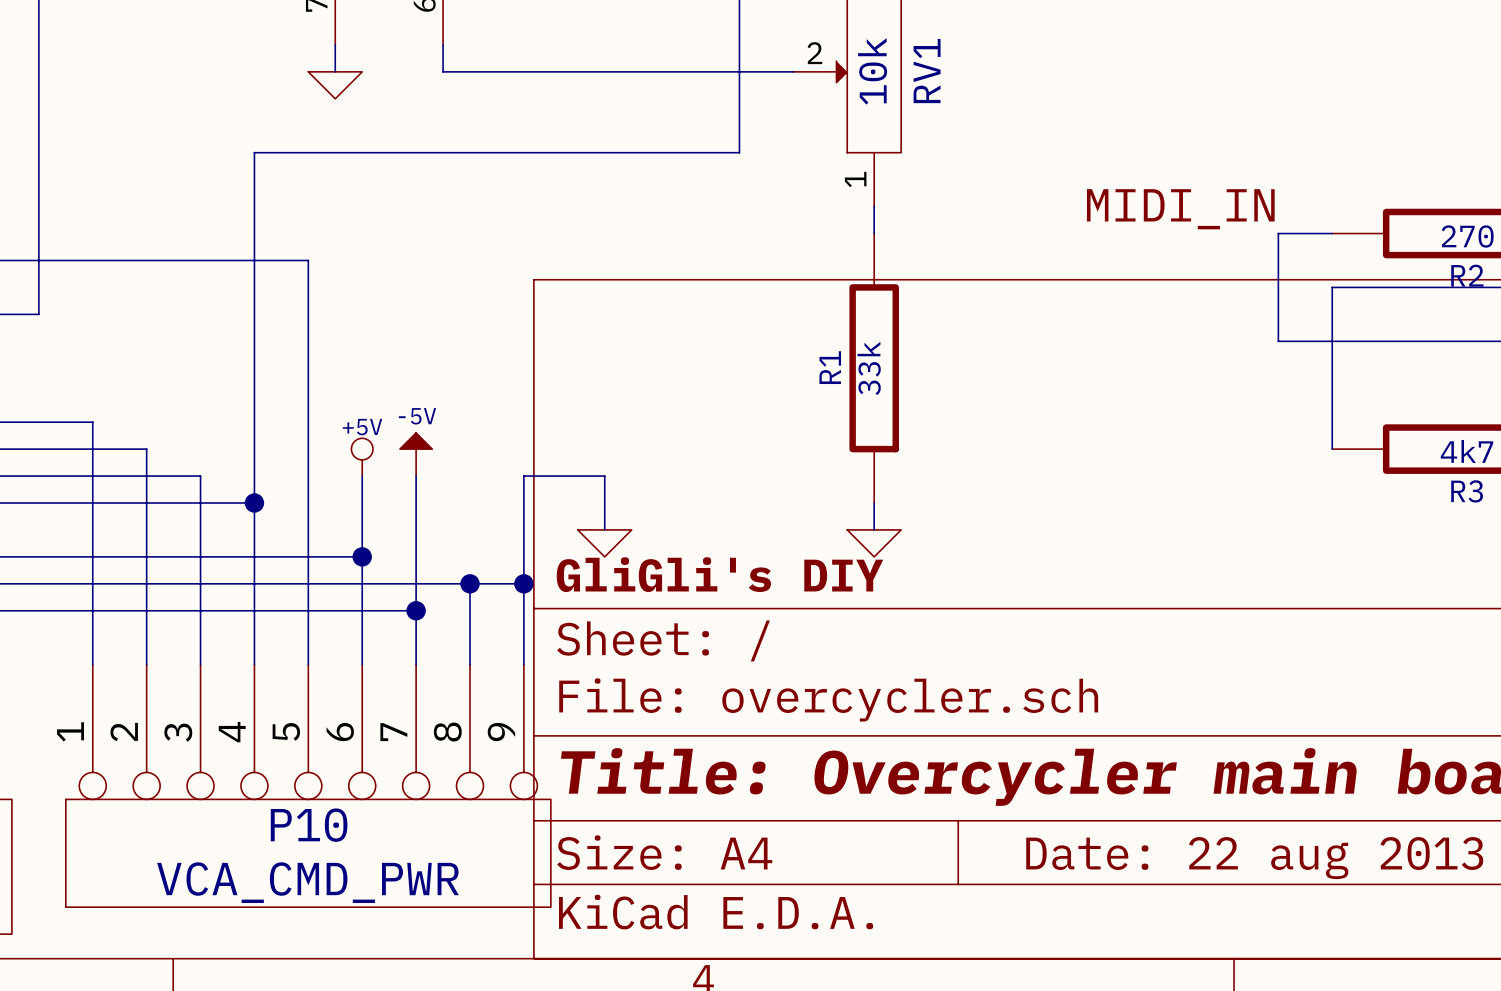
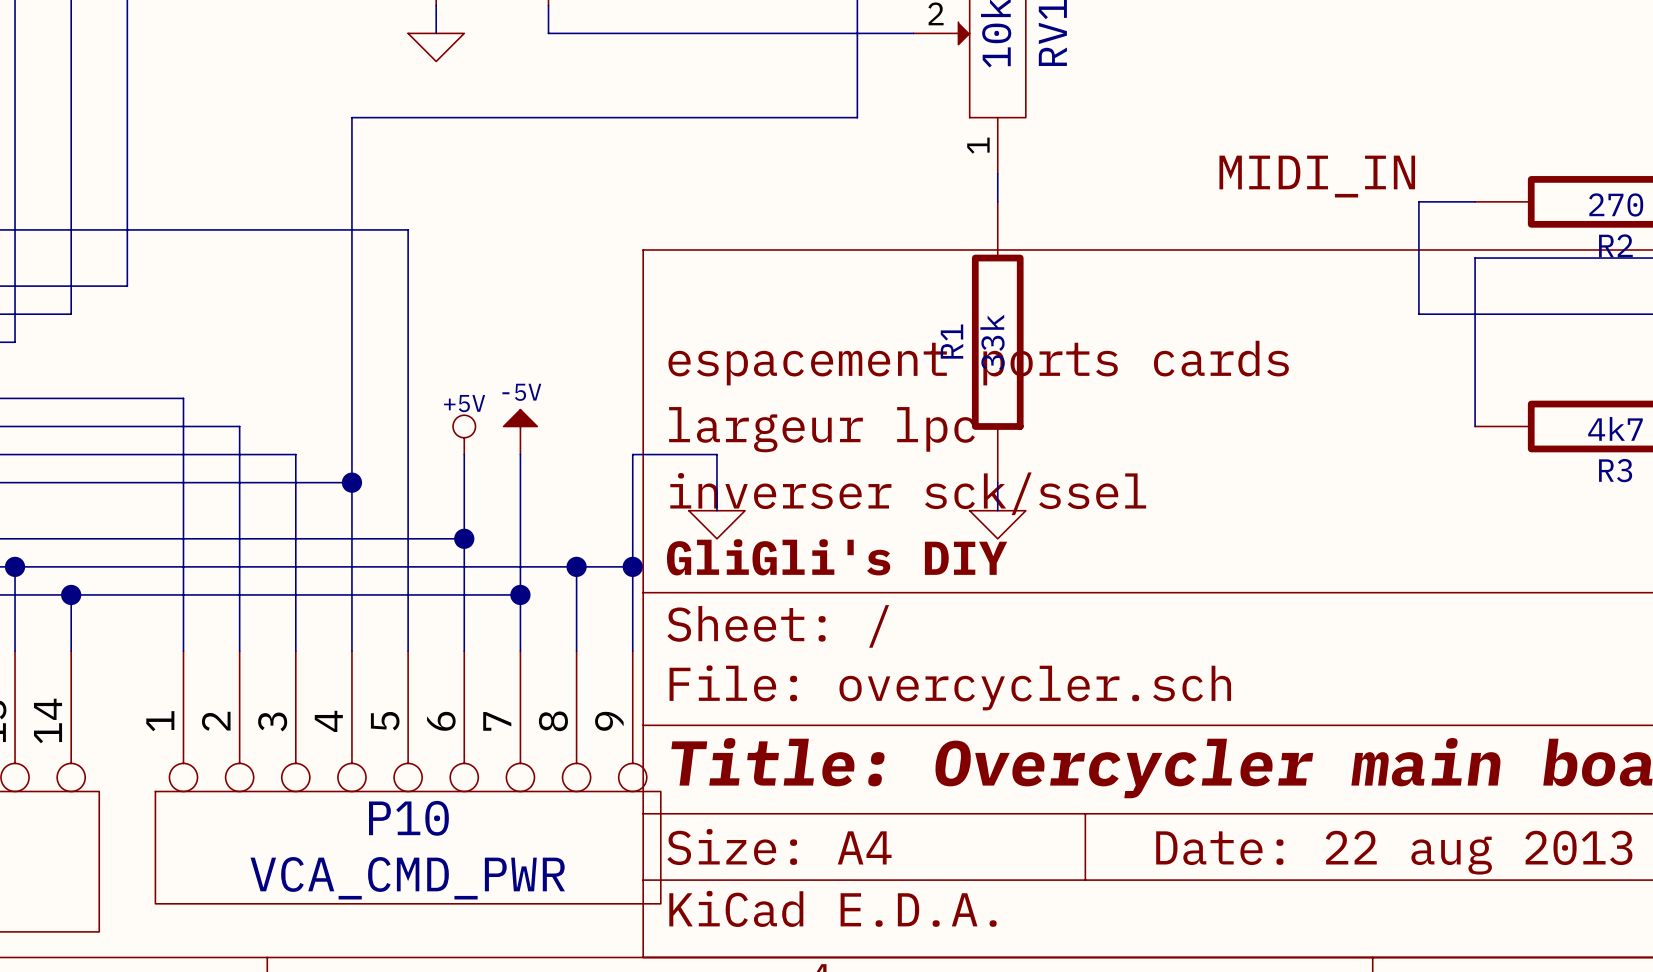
title block: none -> espacement ports cards (978, 363)
title block: none -> largeur lpc (821, 429)
title block: none -> inverser sck/ssel (908, 493)

